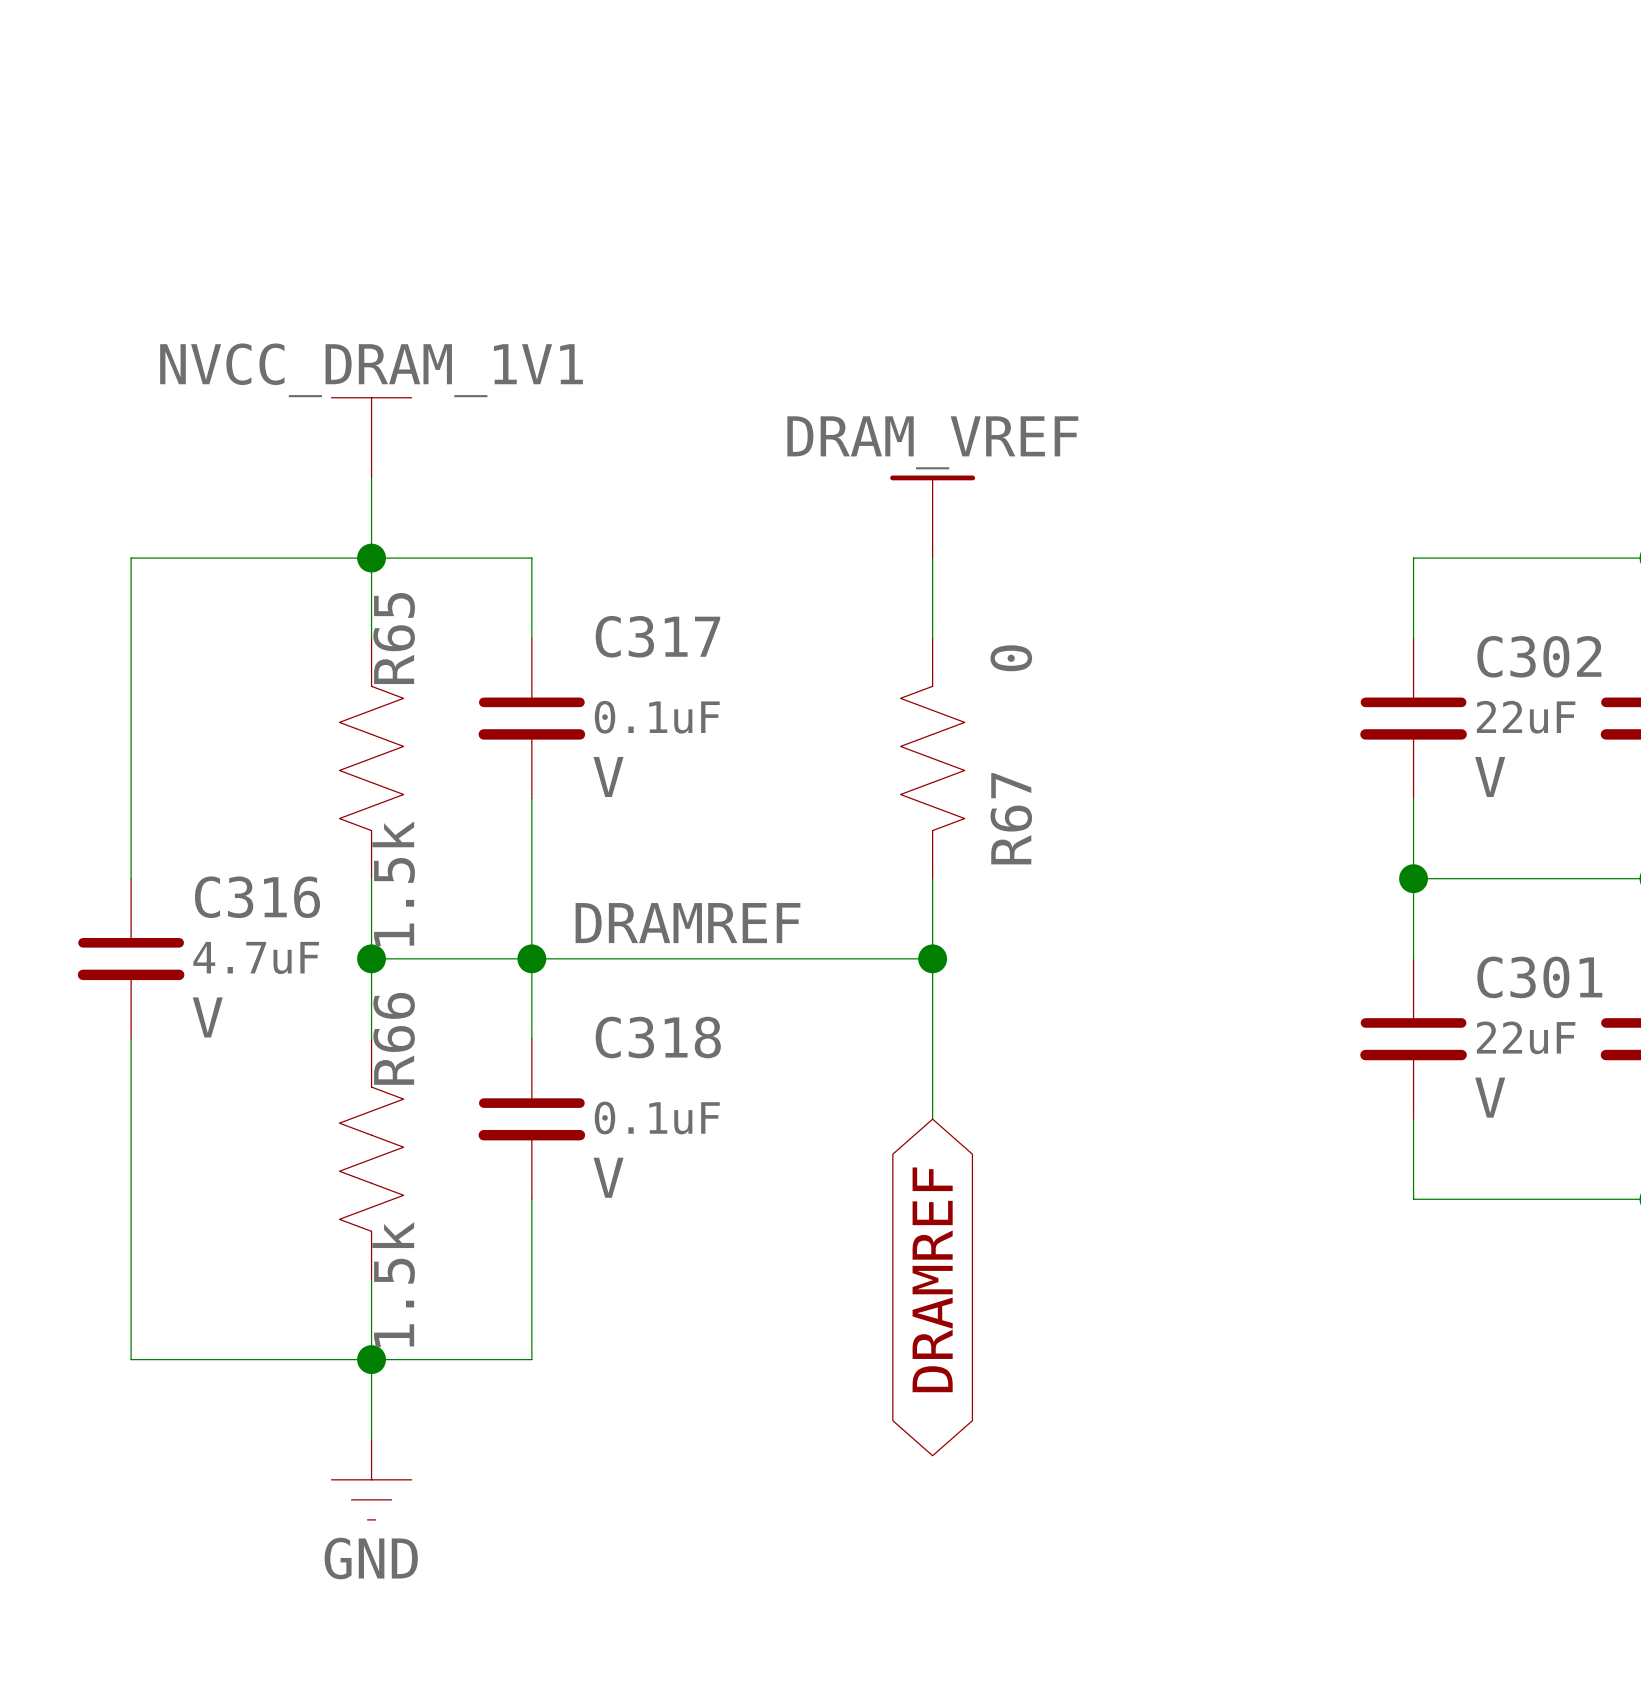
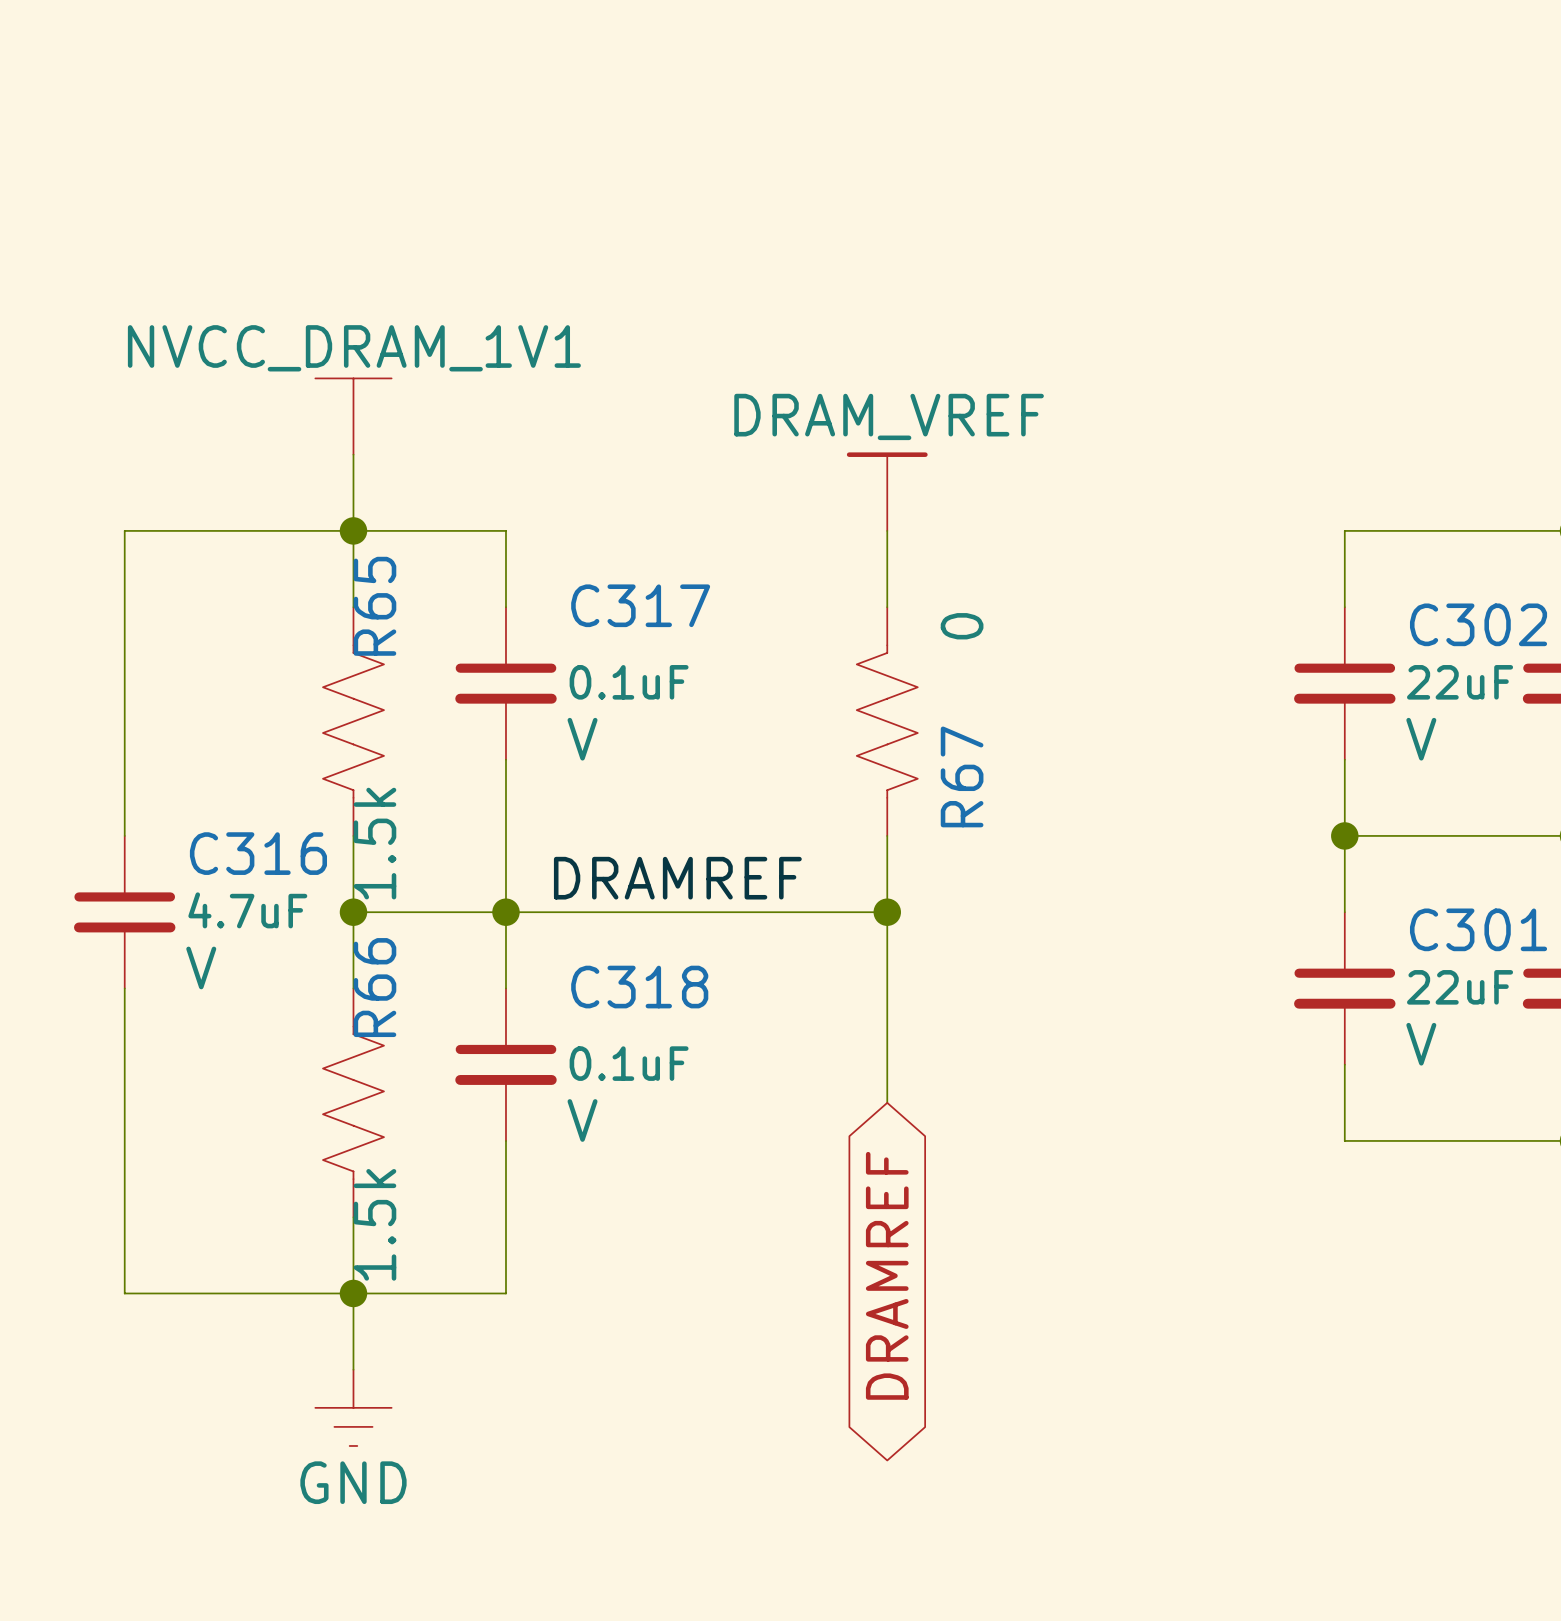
wire: none -> (887, 1064) (887, 1102)
global label position: DRAMREF (932, 1279) -> DRAMREF (887, 1275)

